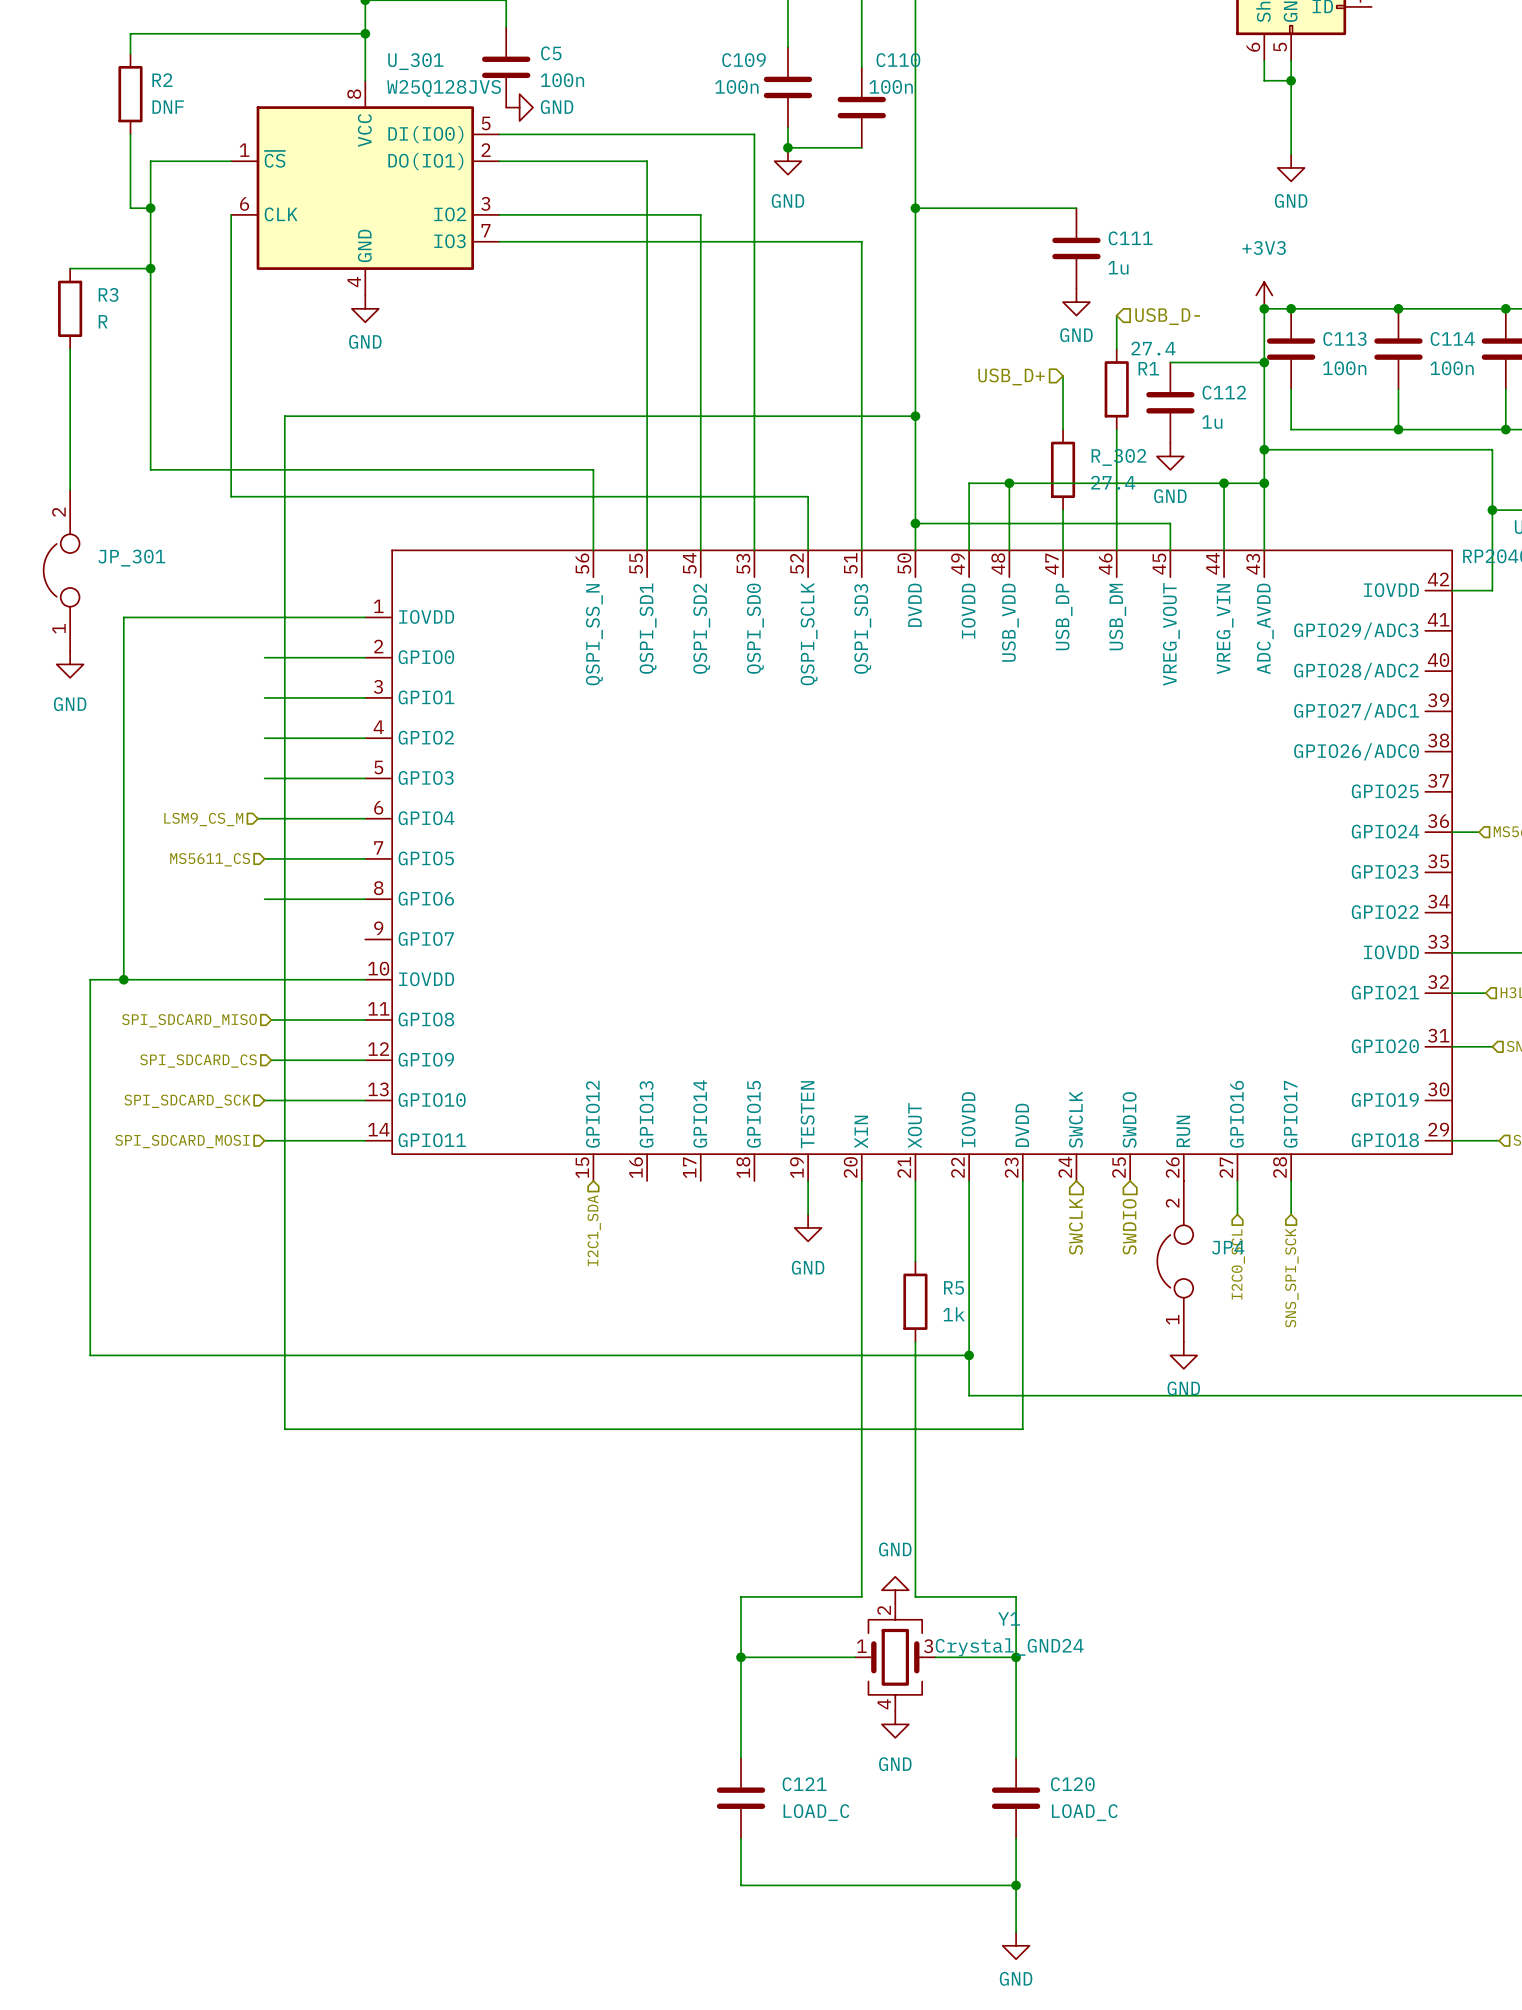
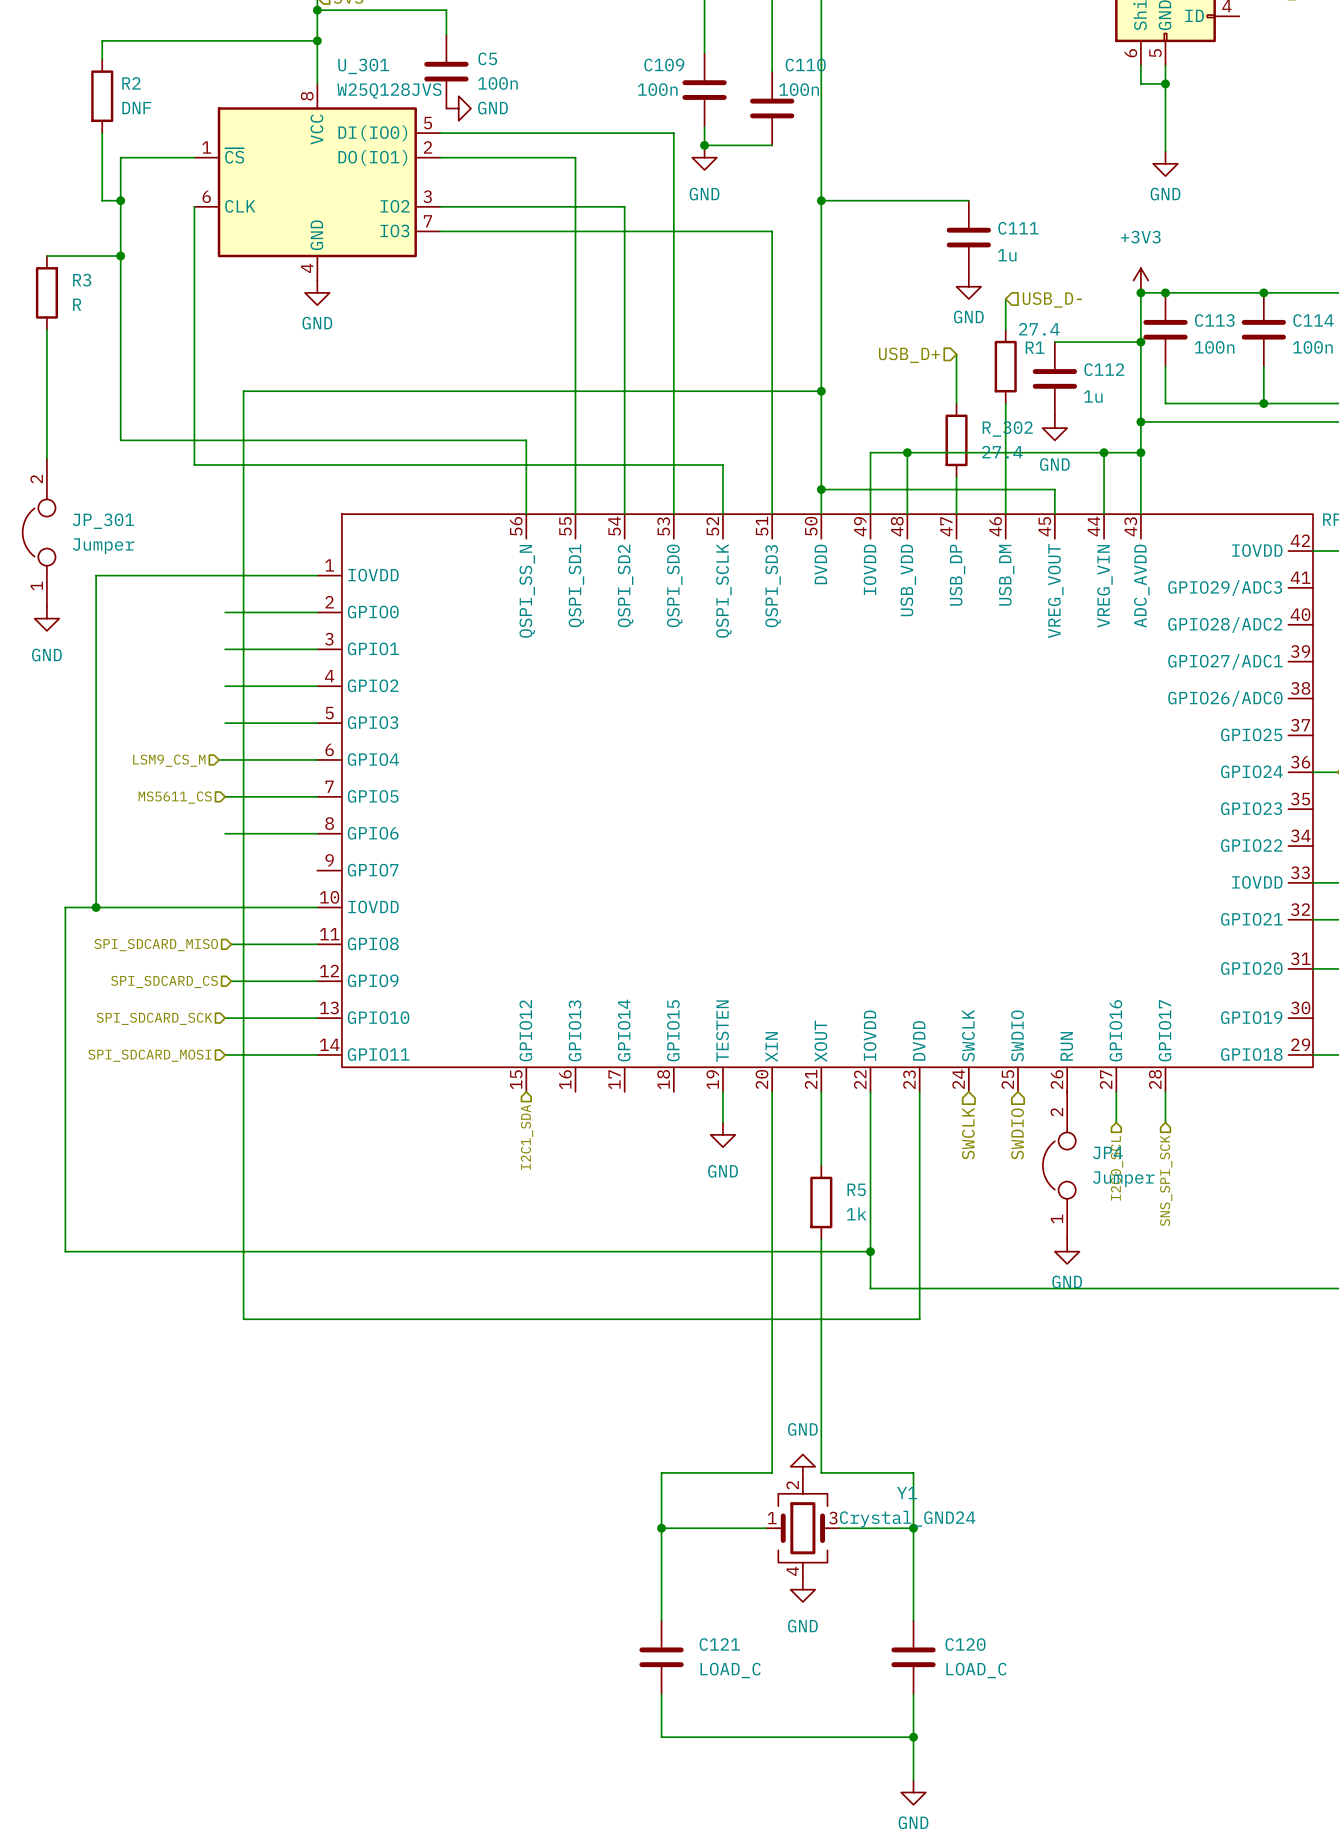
JP_301 value: none -> Jumper (103, 546)
JP4 value: none -> Jumper (1123, 1179)

